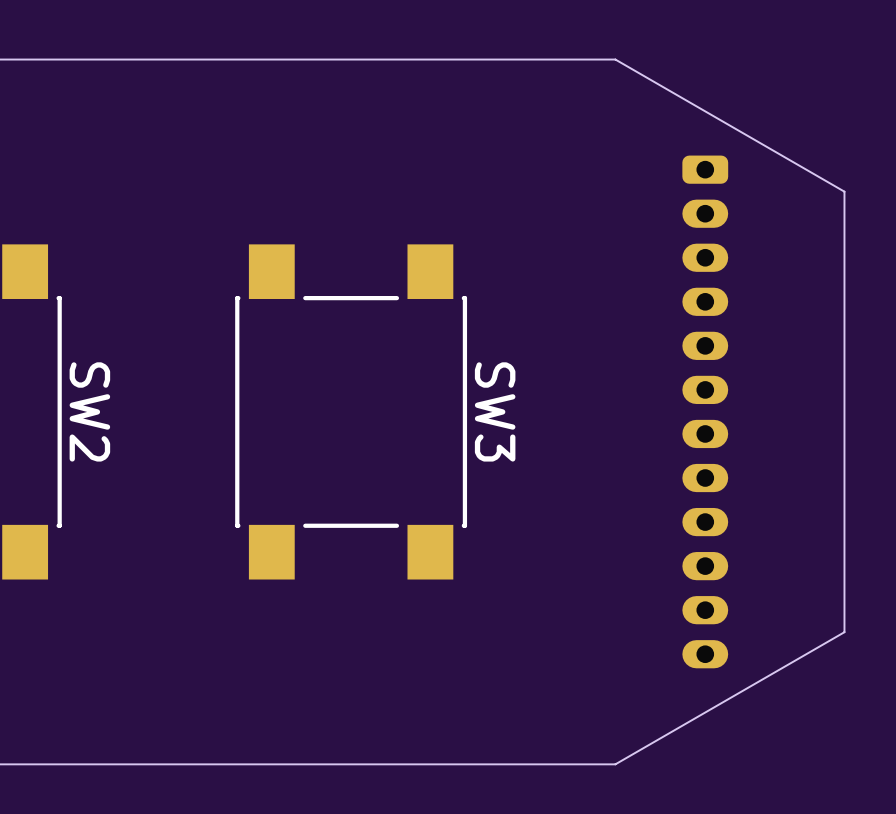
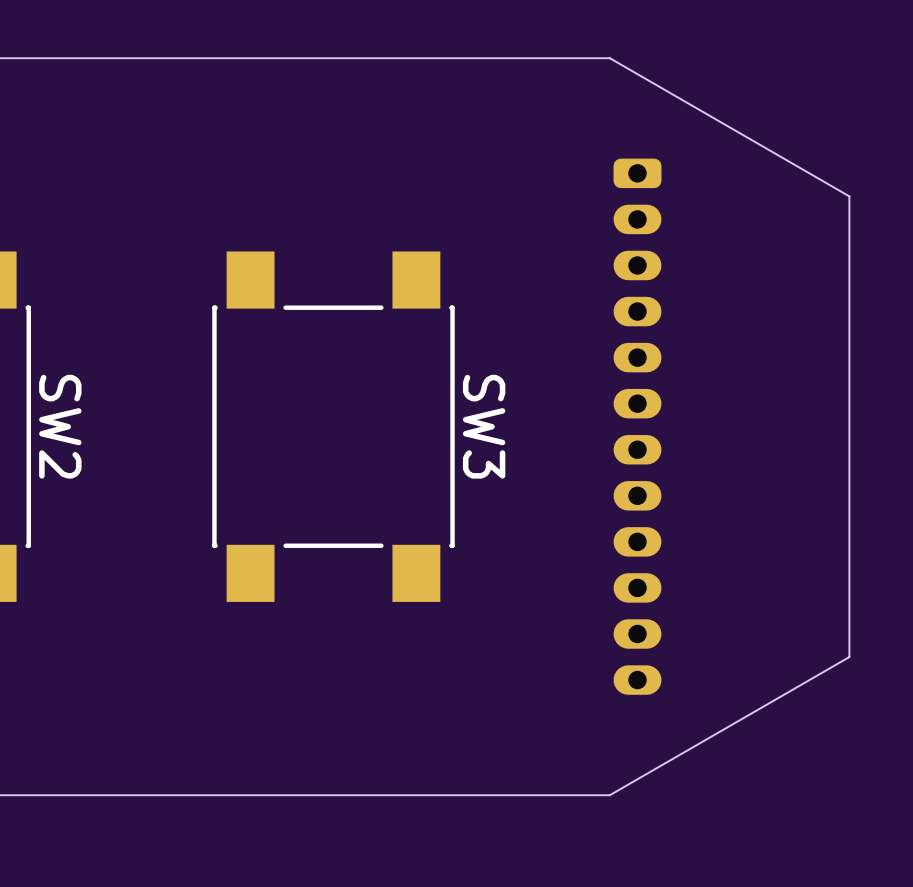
part position: (705, 411) -> (637, 426)

